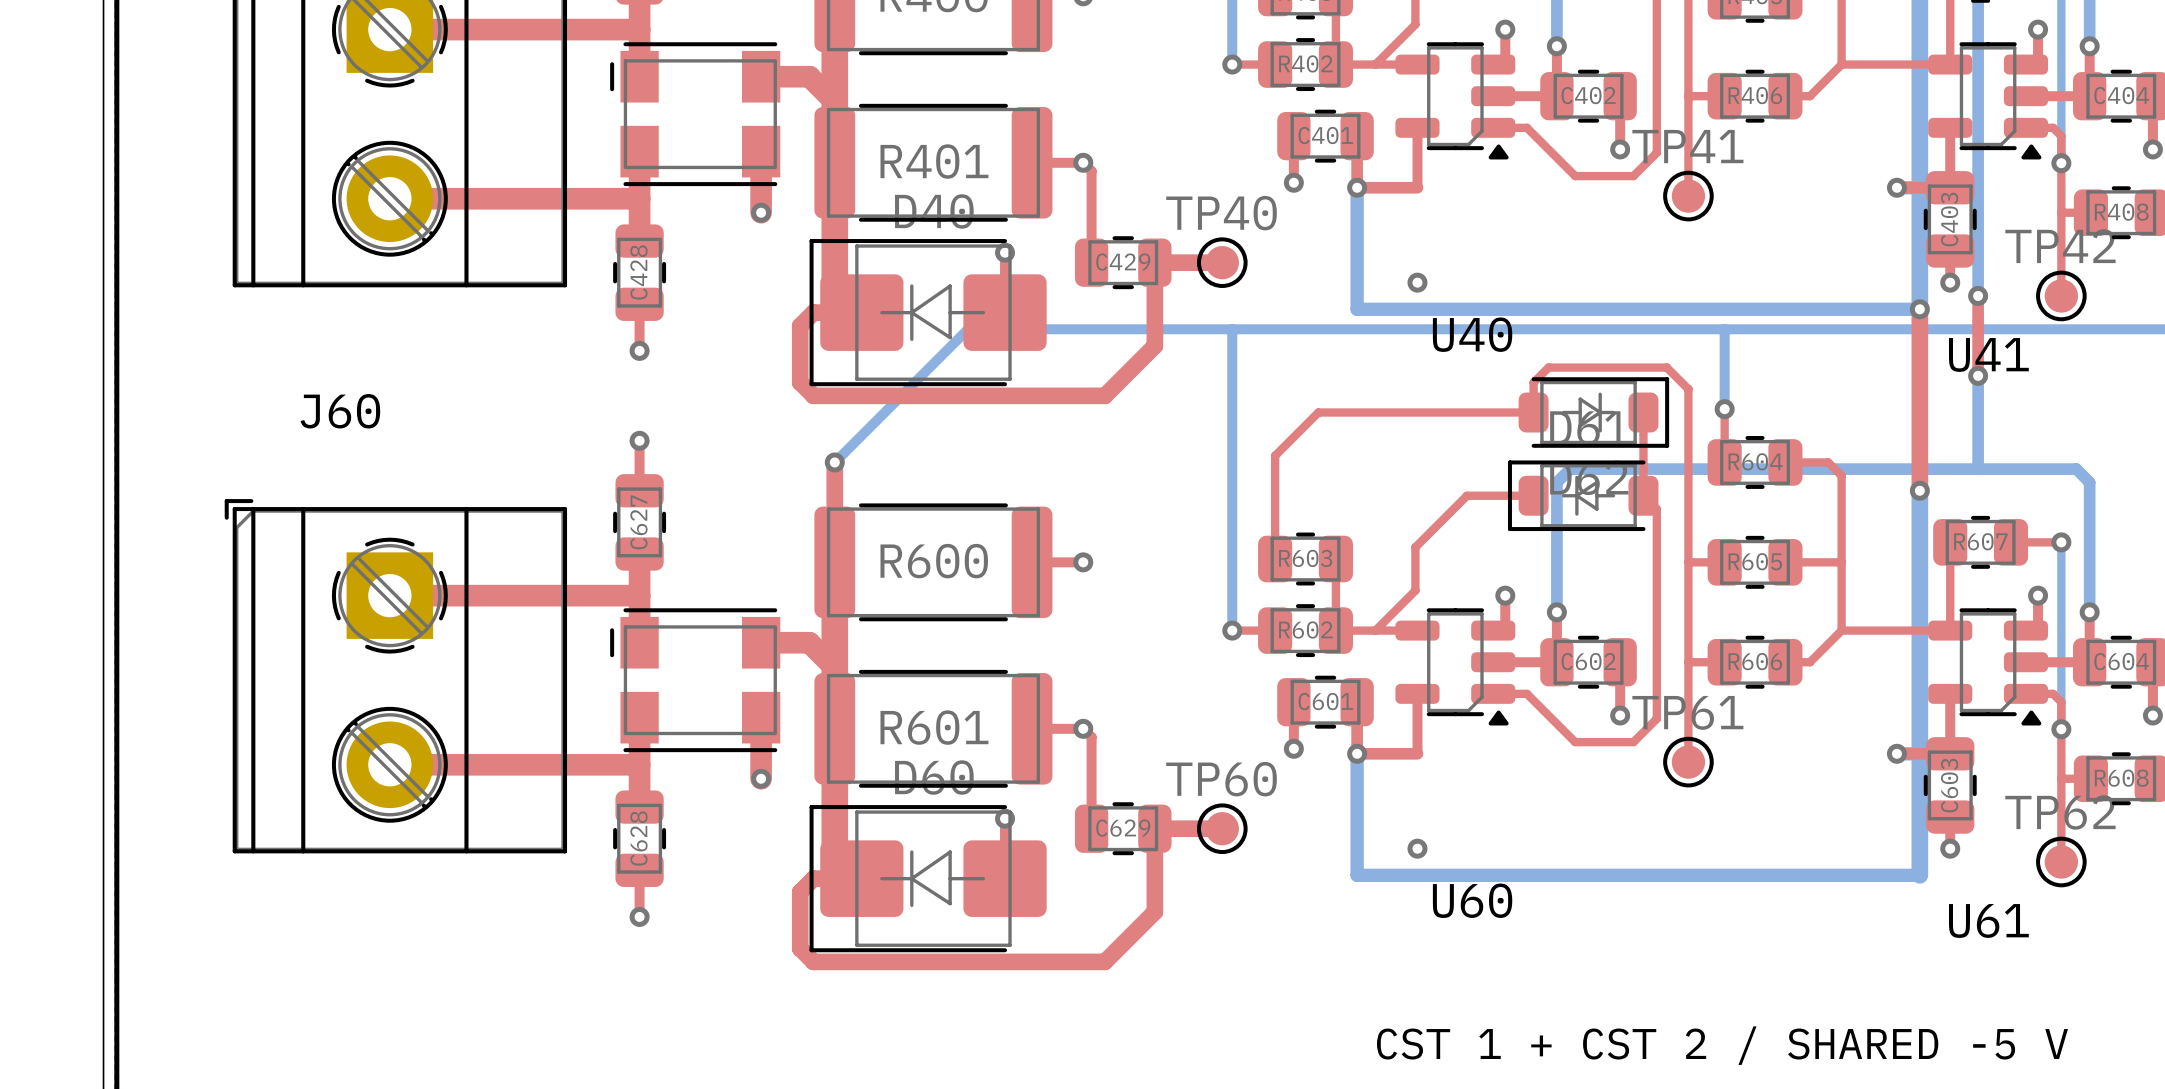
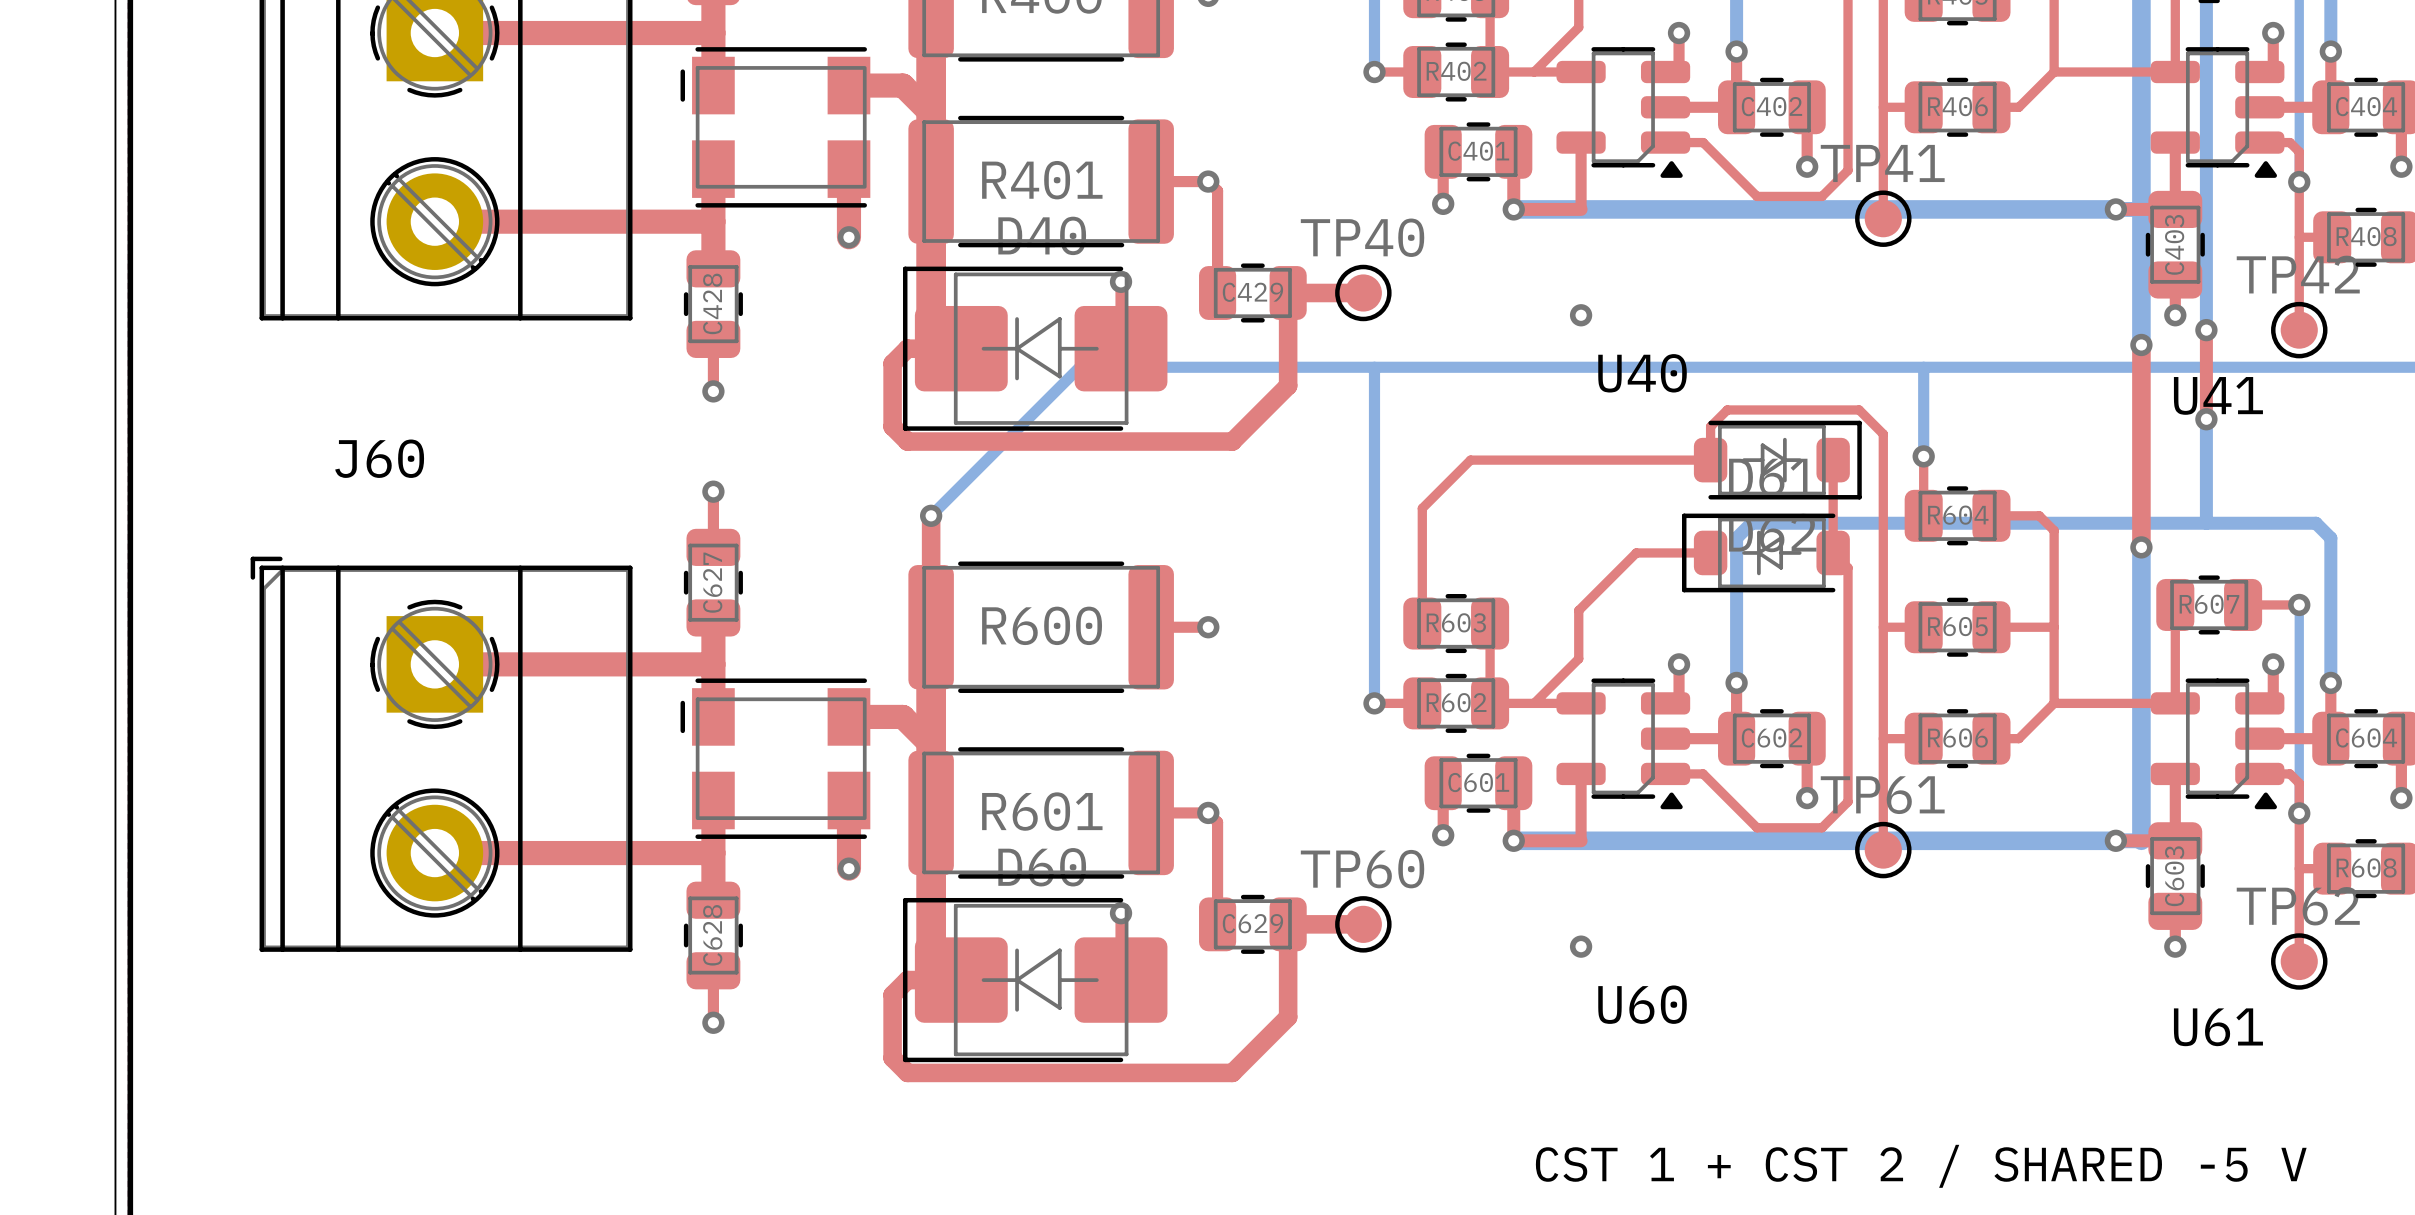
bottom track: (1357, 187) (1357, 309) (1919, 309) -> (1513, 209) (2115, 209)
bottom track: (1357, 753) (1357, 875) (1919, 875) (1919, 753) -> (1513, 840) (2115, 840)

